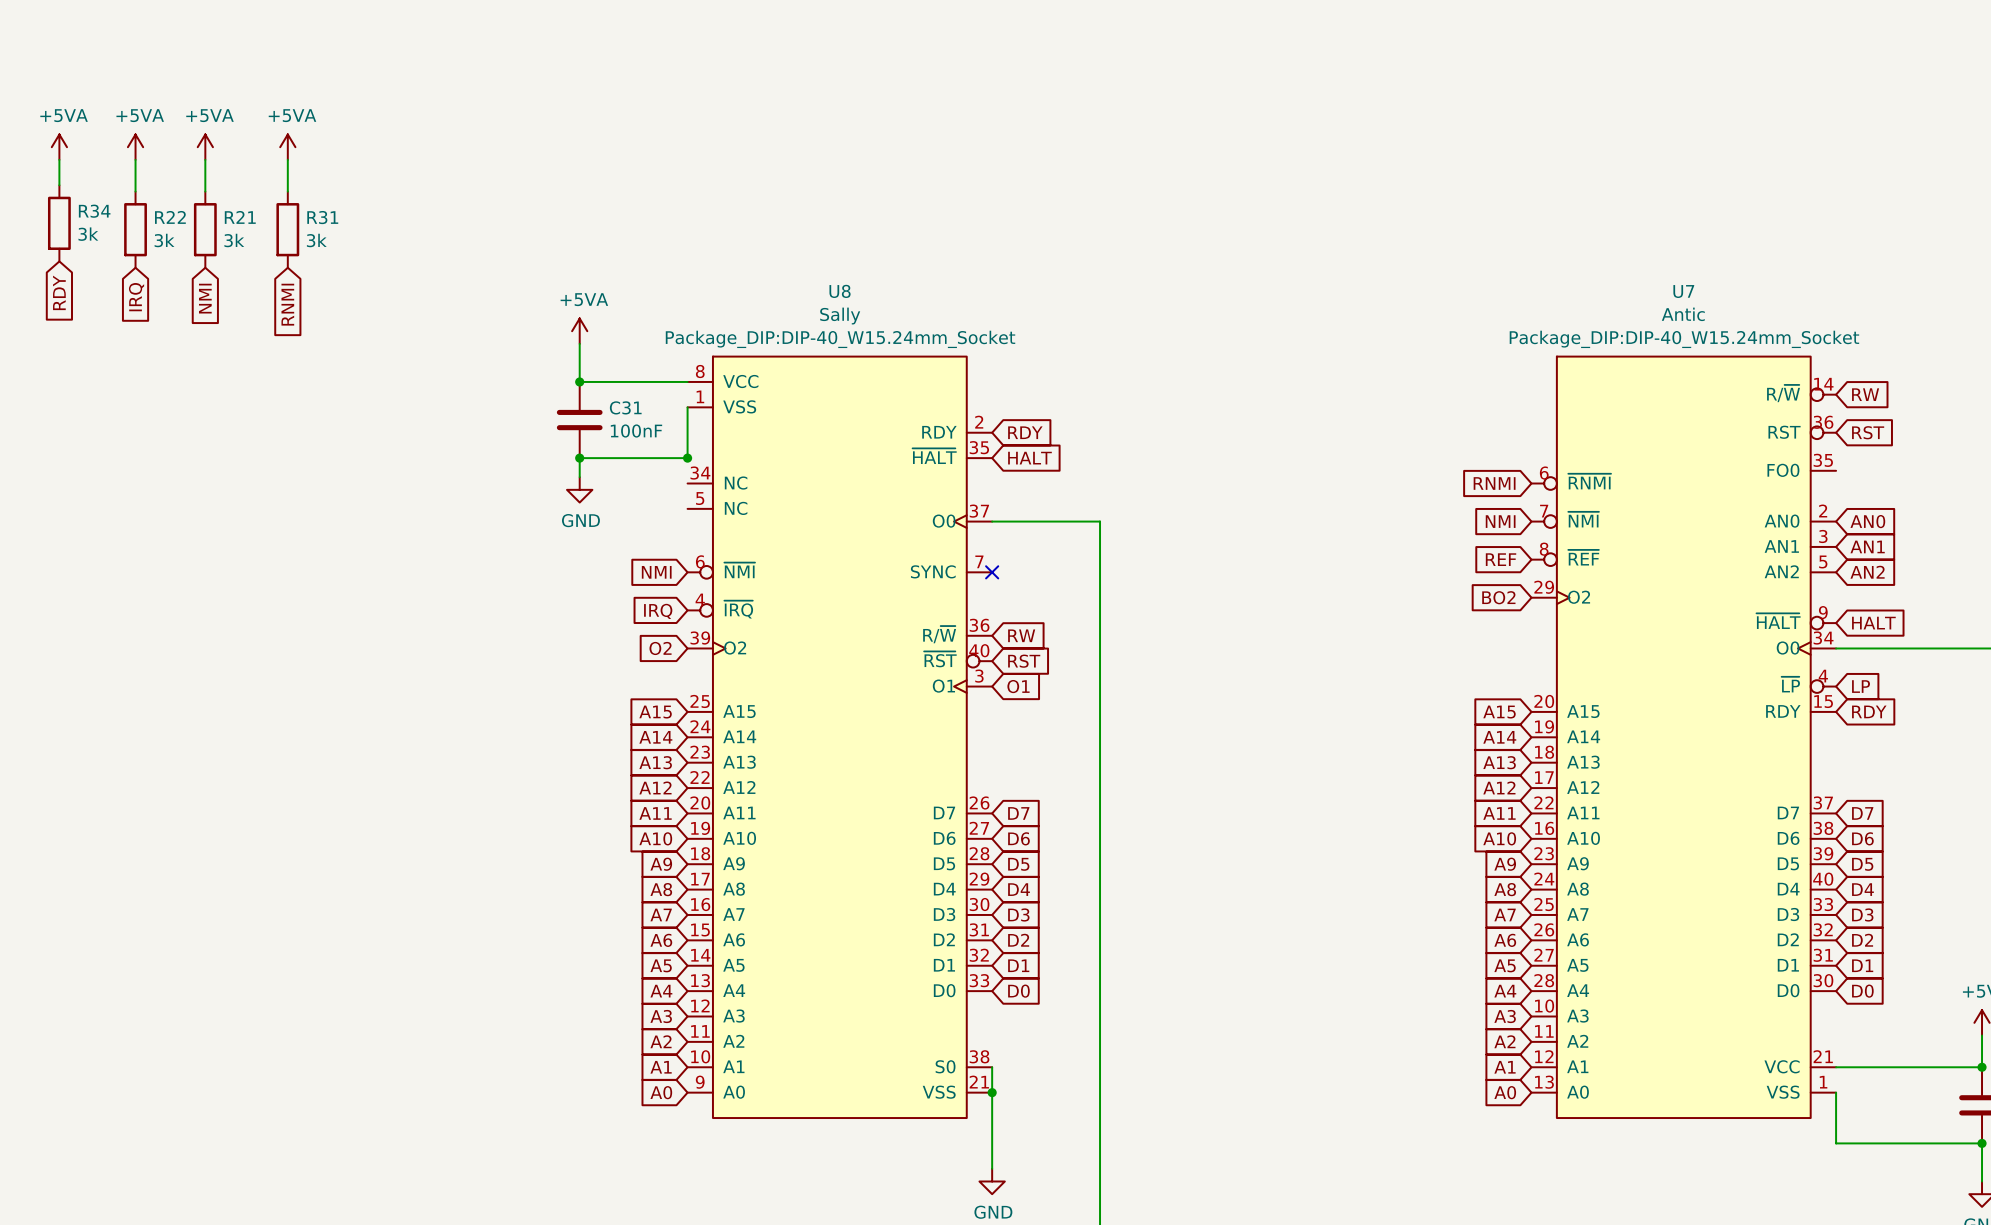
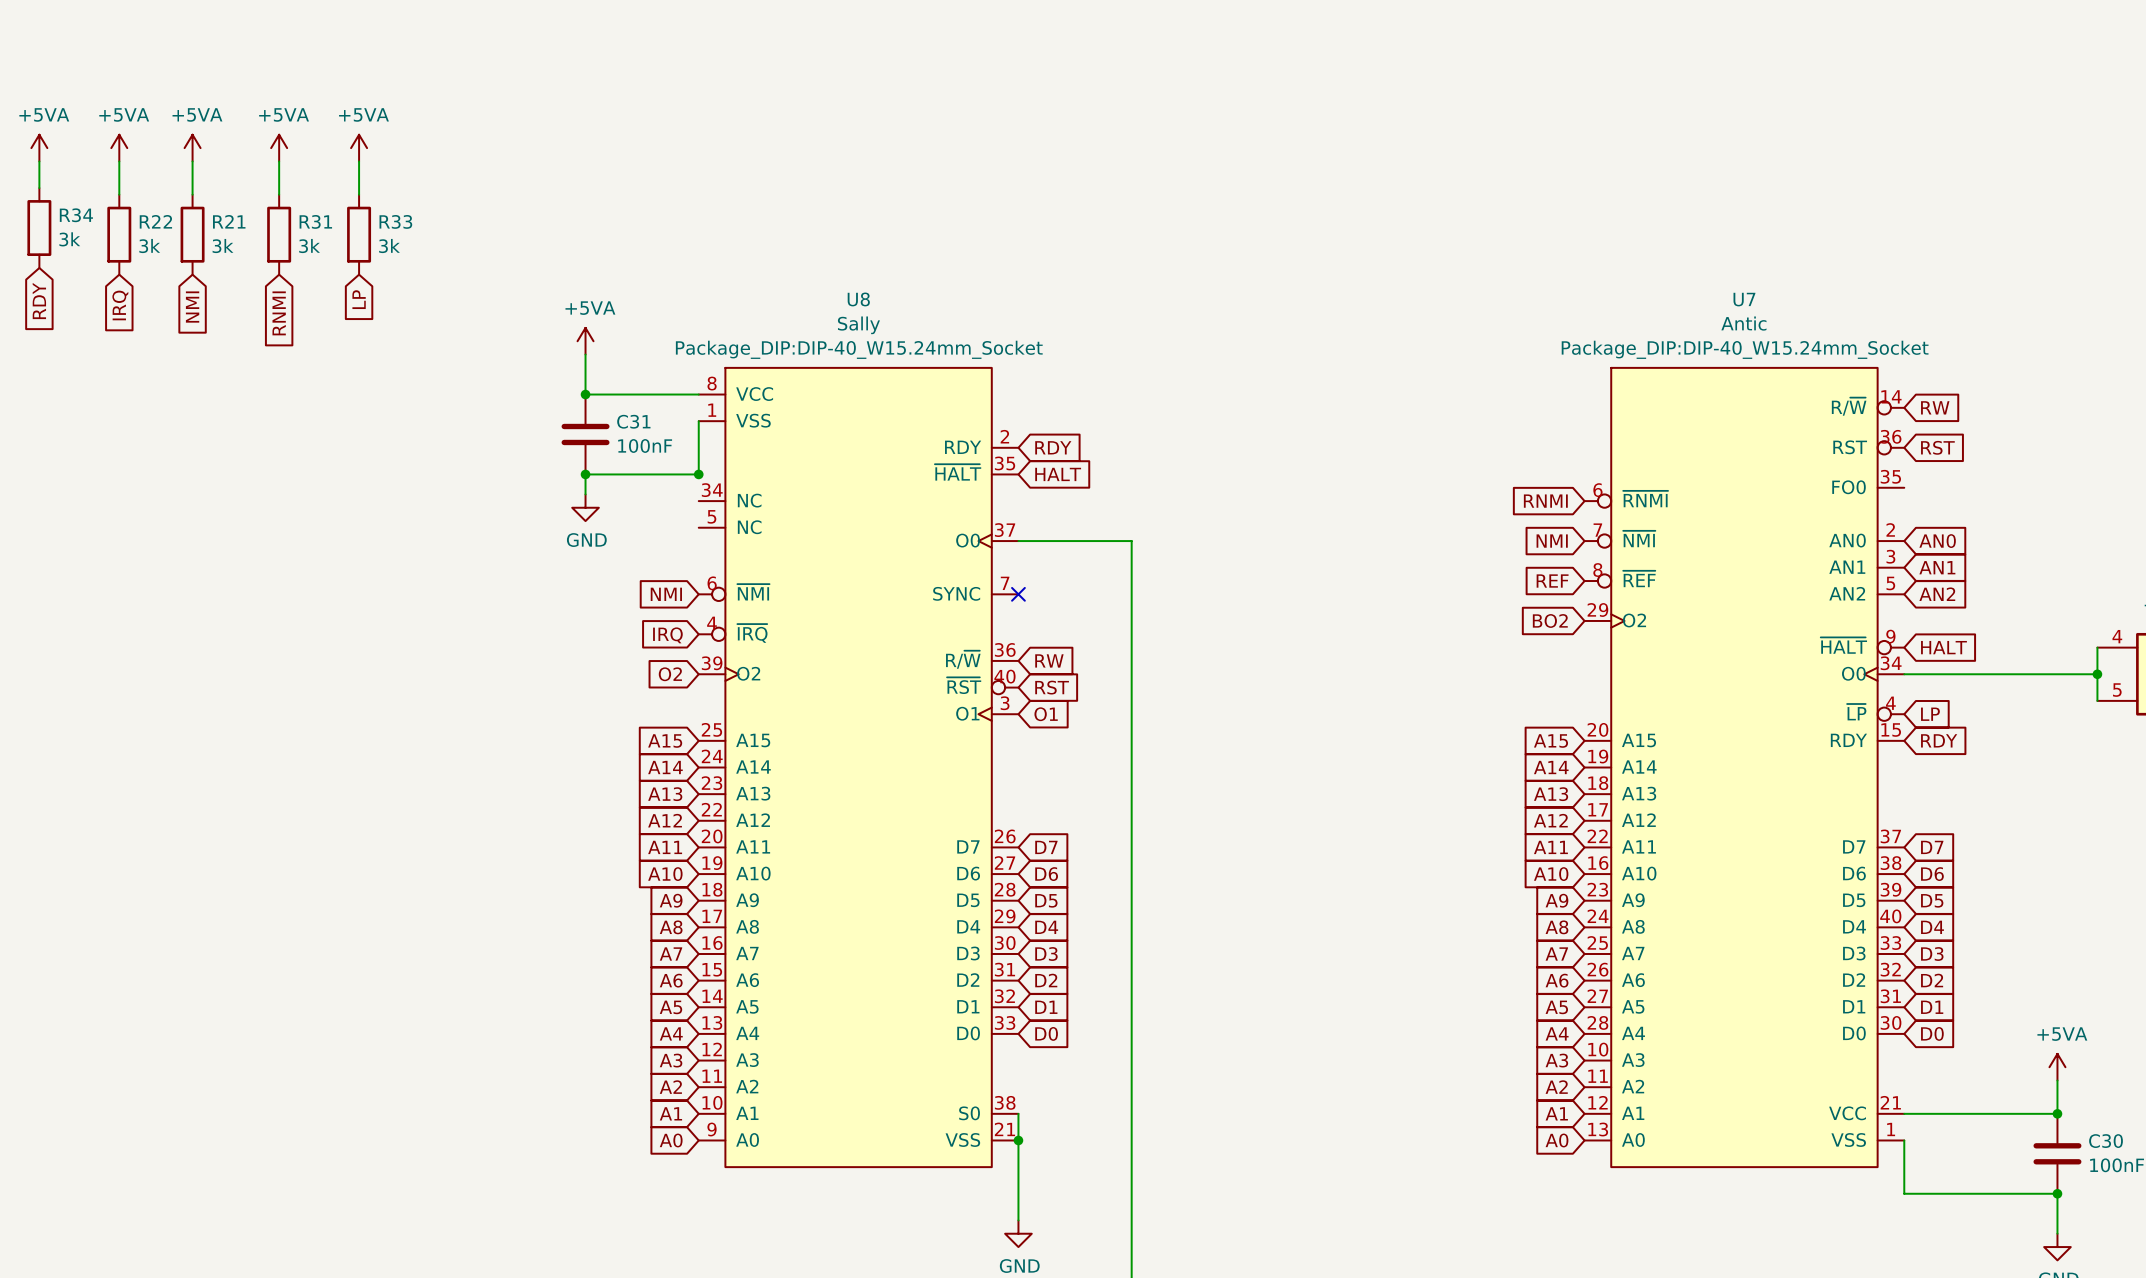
power symbol: none -> +5VA (359, 148)
wire: none -> (359, 161) (359, 194)
R33: none -> 3k (359, 234)
global label: none -> LP (359, 299)

